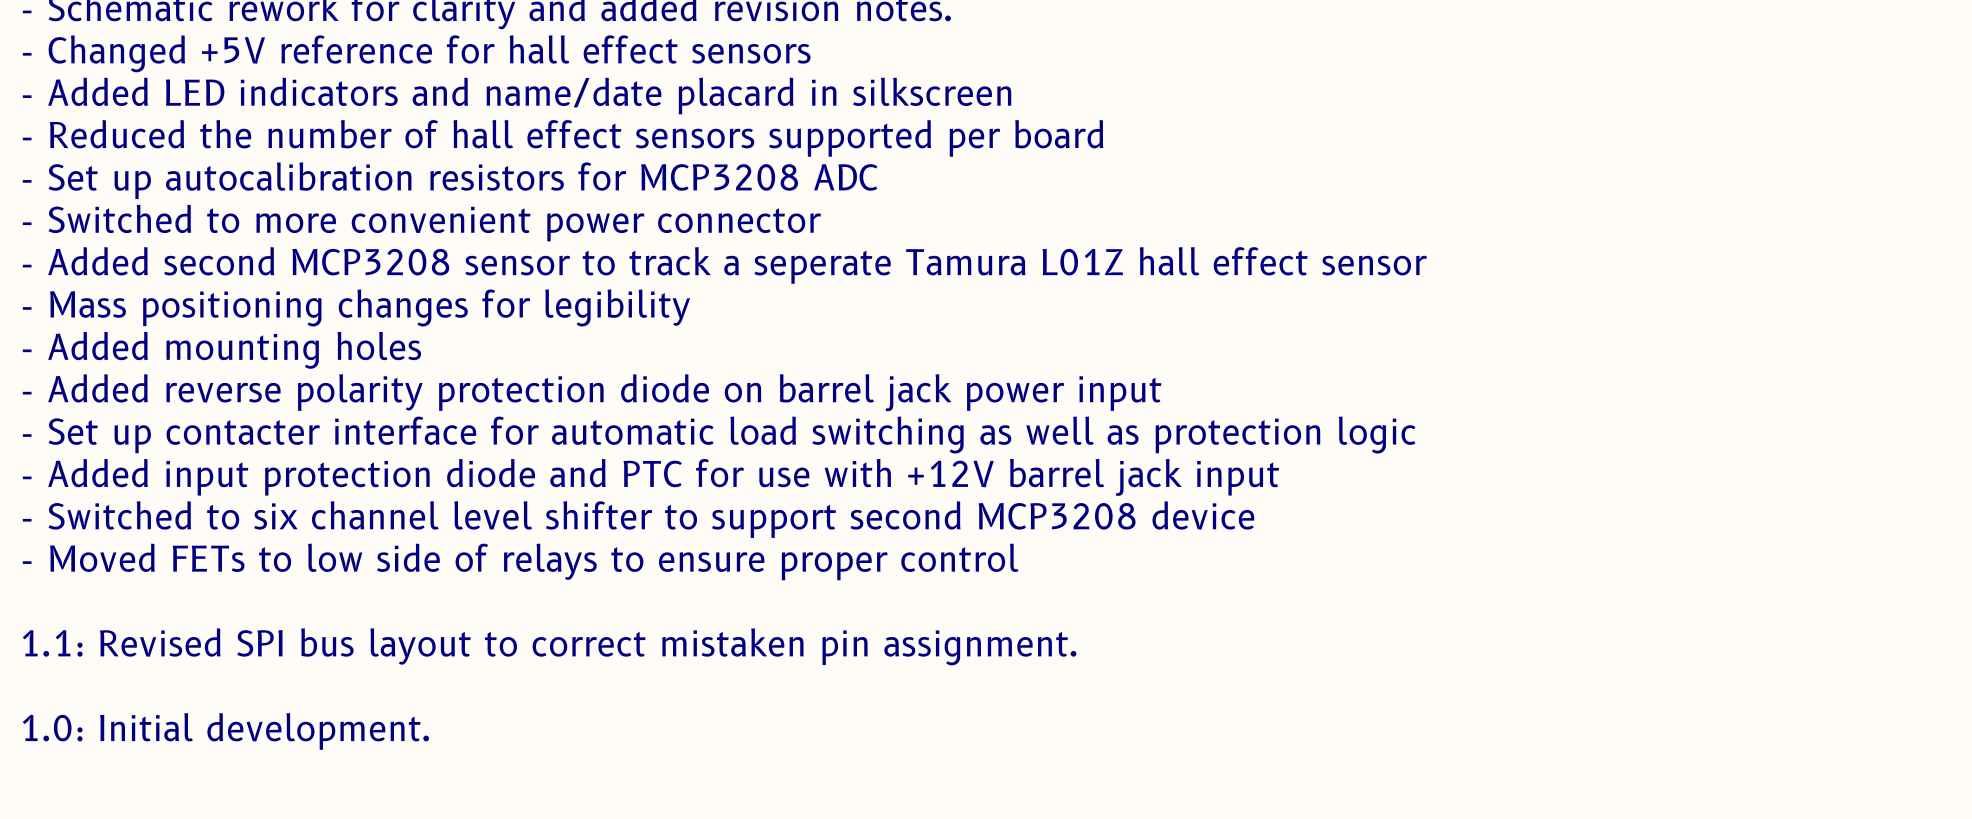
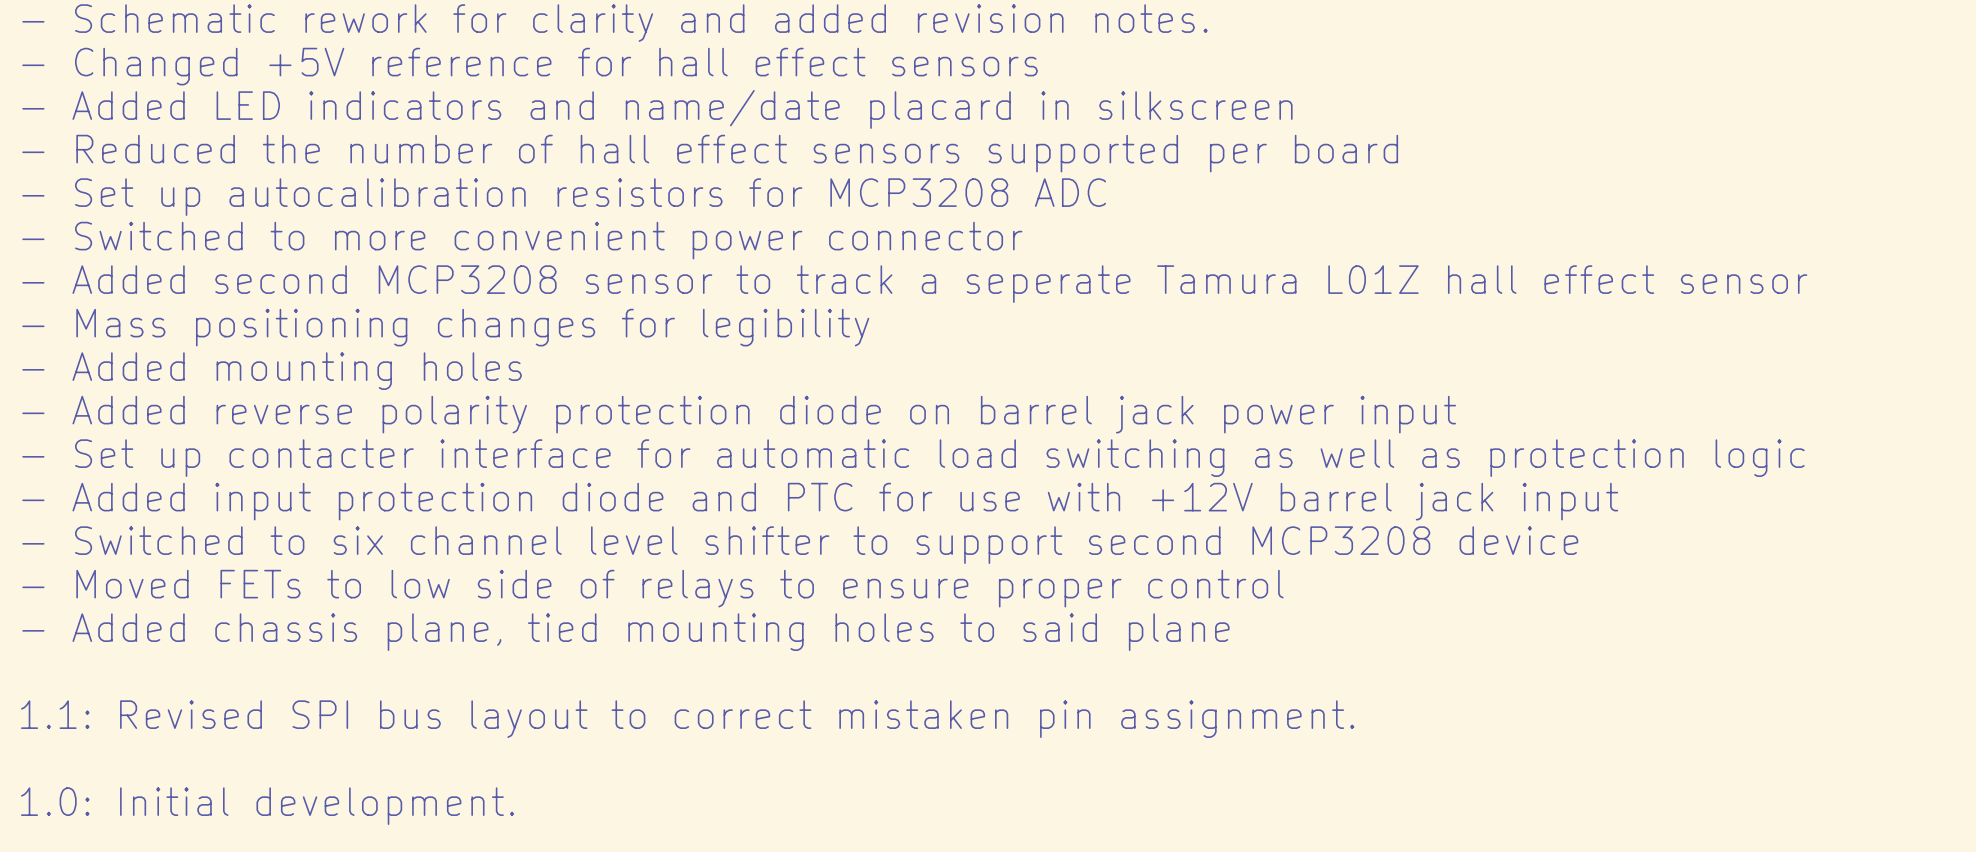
text: none -> - Added chassis plane, tied mounting holes to said plane (625, 632)
text position: 1.1: Revised SPI bus layout to correct mistaken pin assignment. (549, 646) -> 1.1: Revised SPI bus layout to correct mistaken pin assignment. (687, 719)
text position: 1.0: Initial development. (225, 731) -> 1.0: Initial development. (267, 806)

